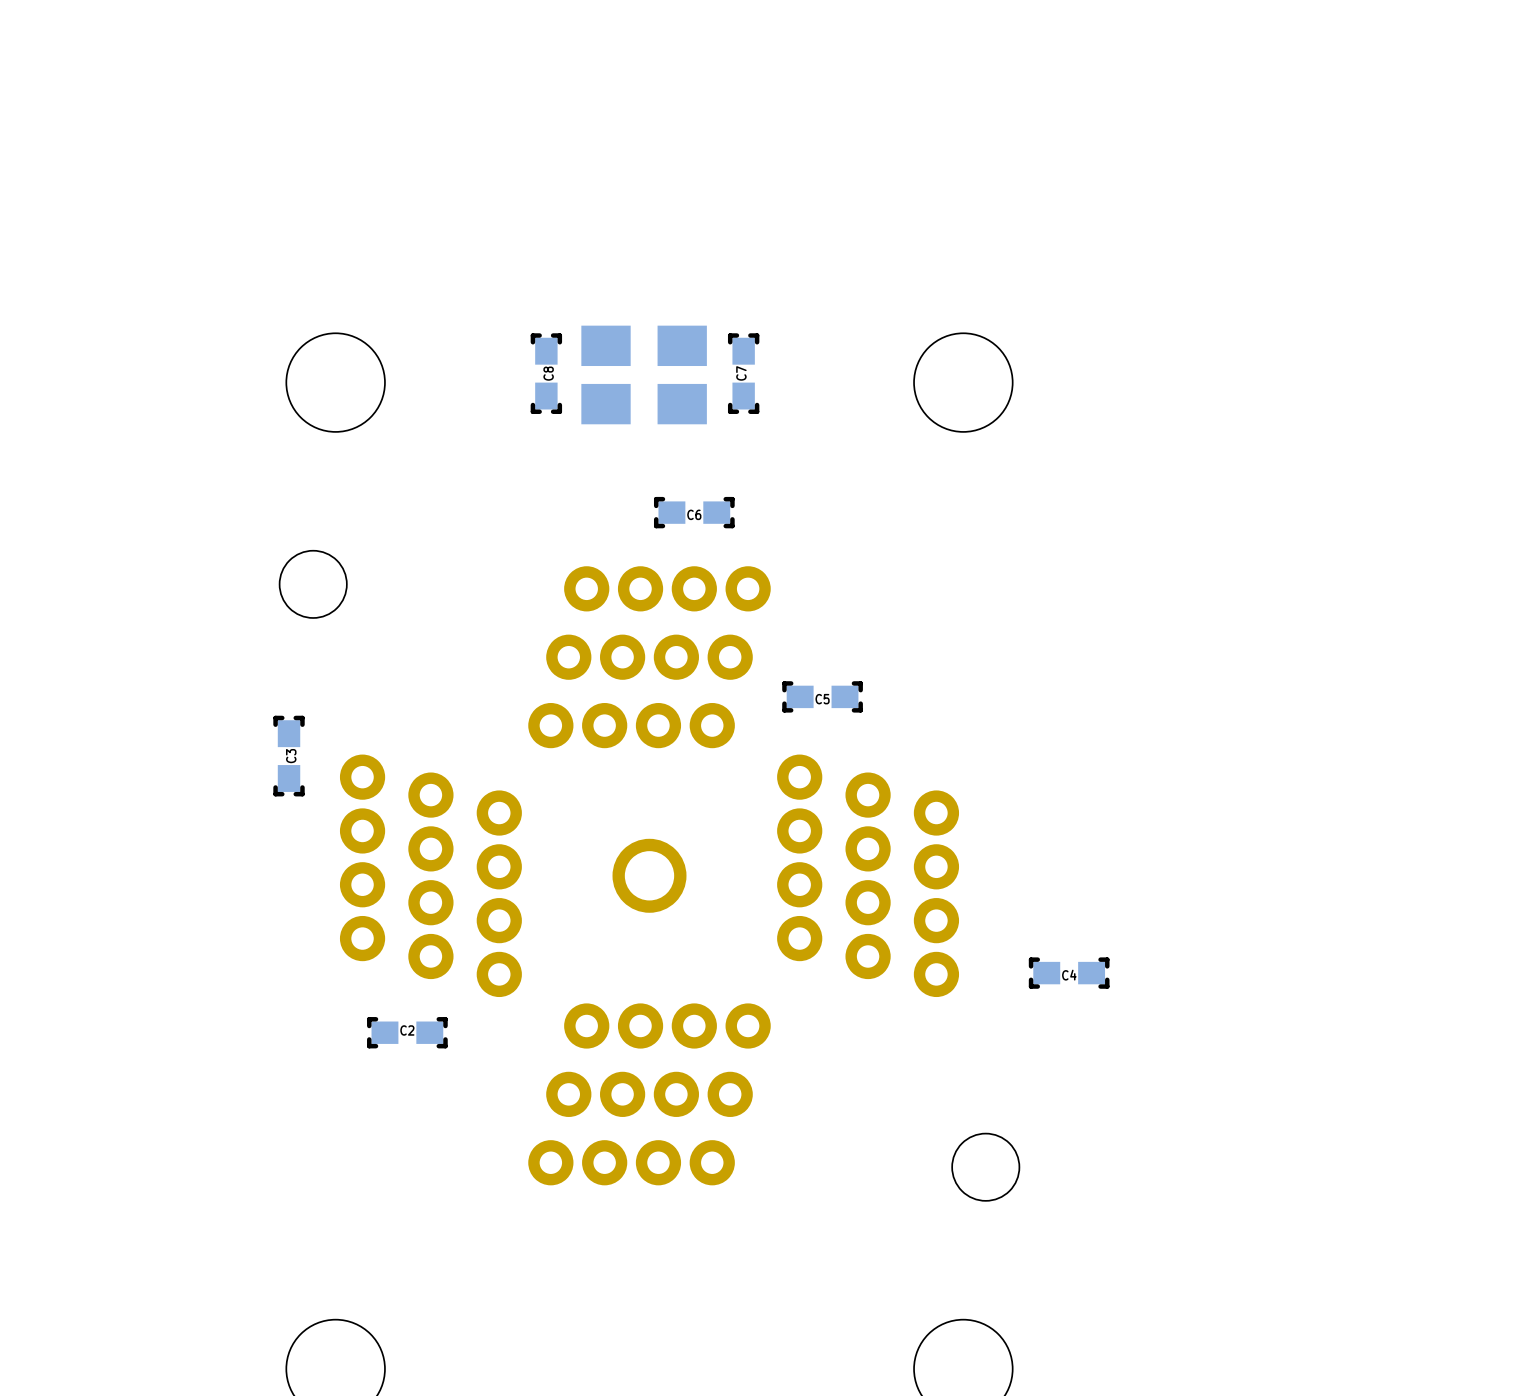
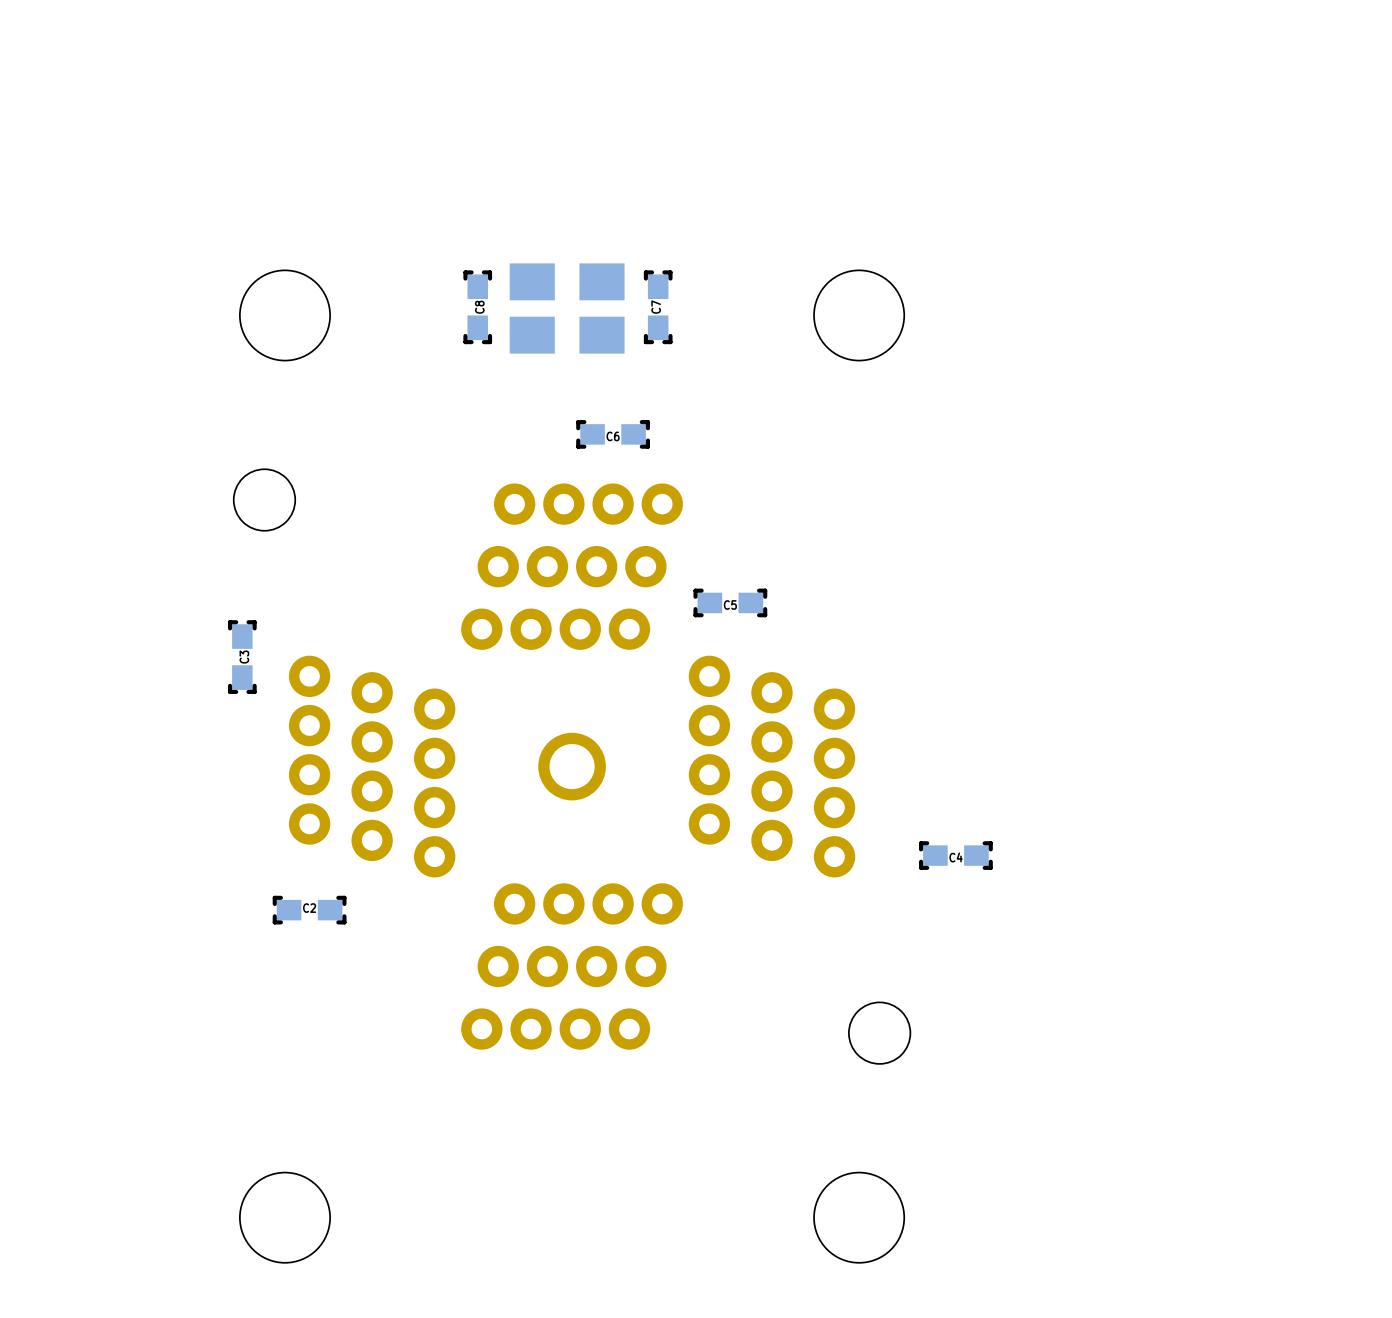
C2 position: (407, 1032) -> (309, 910)

